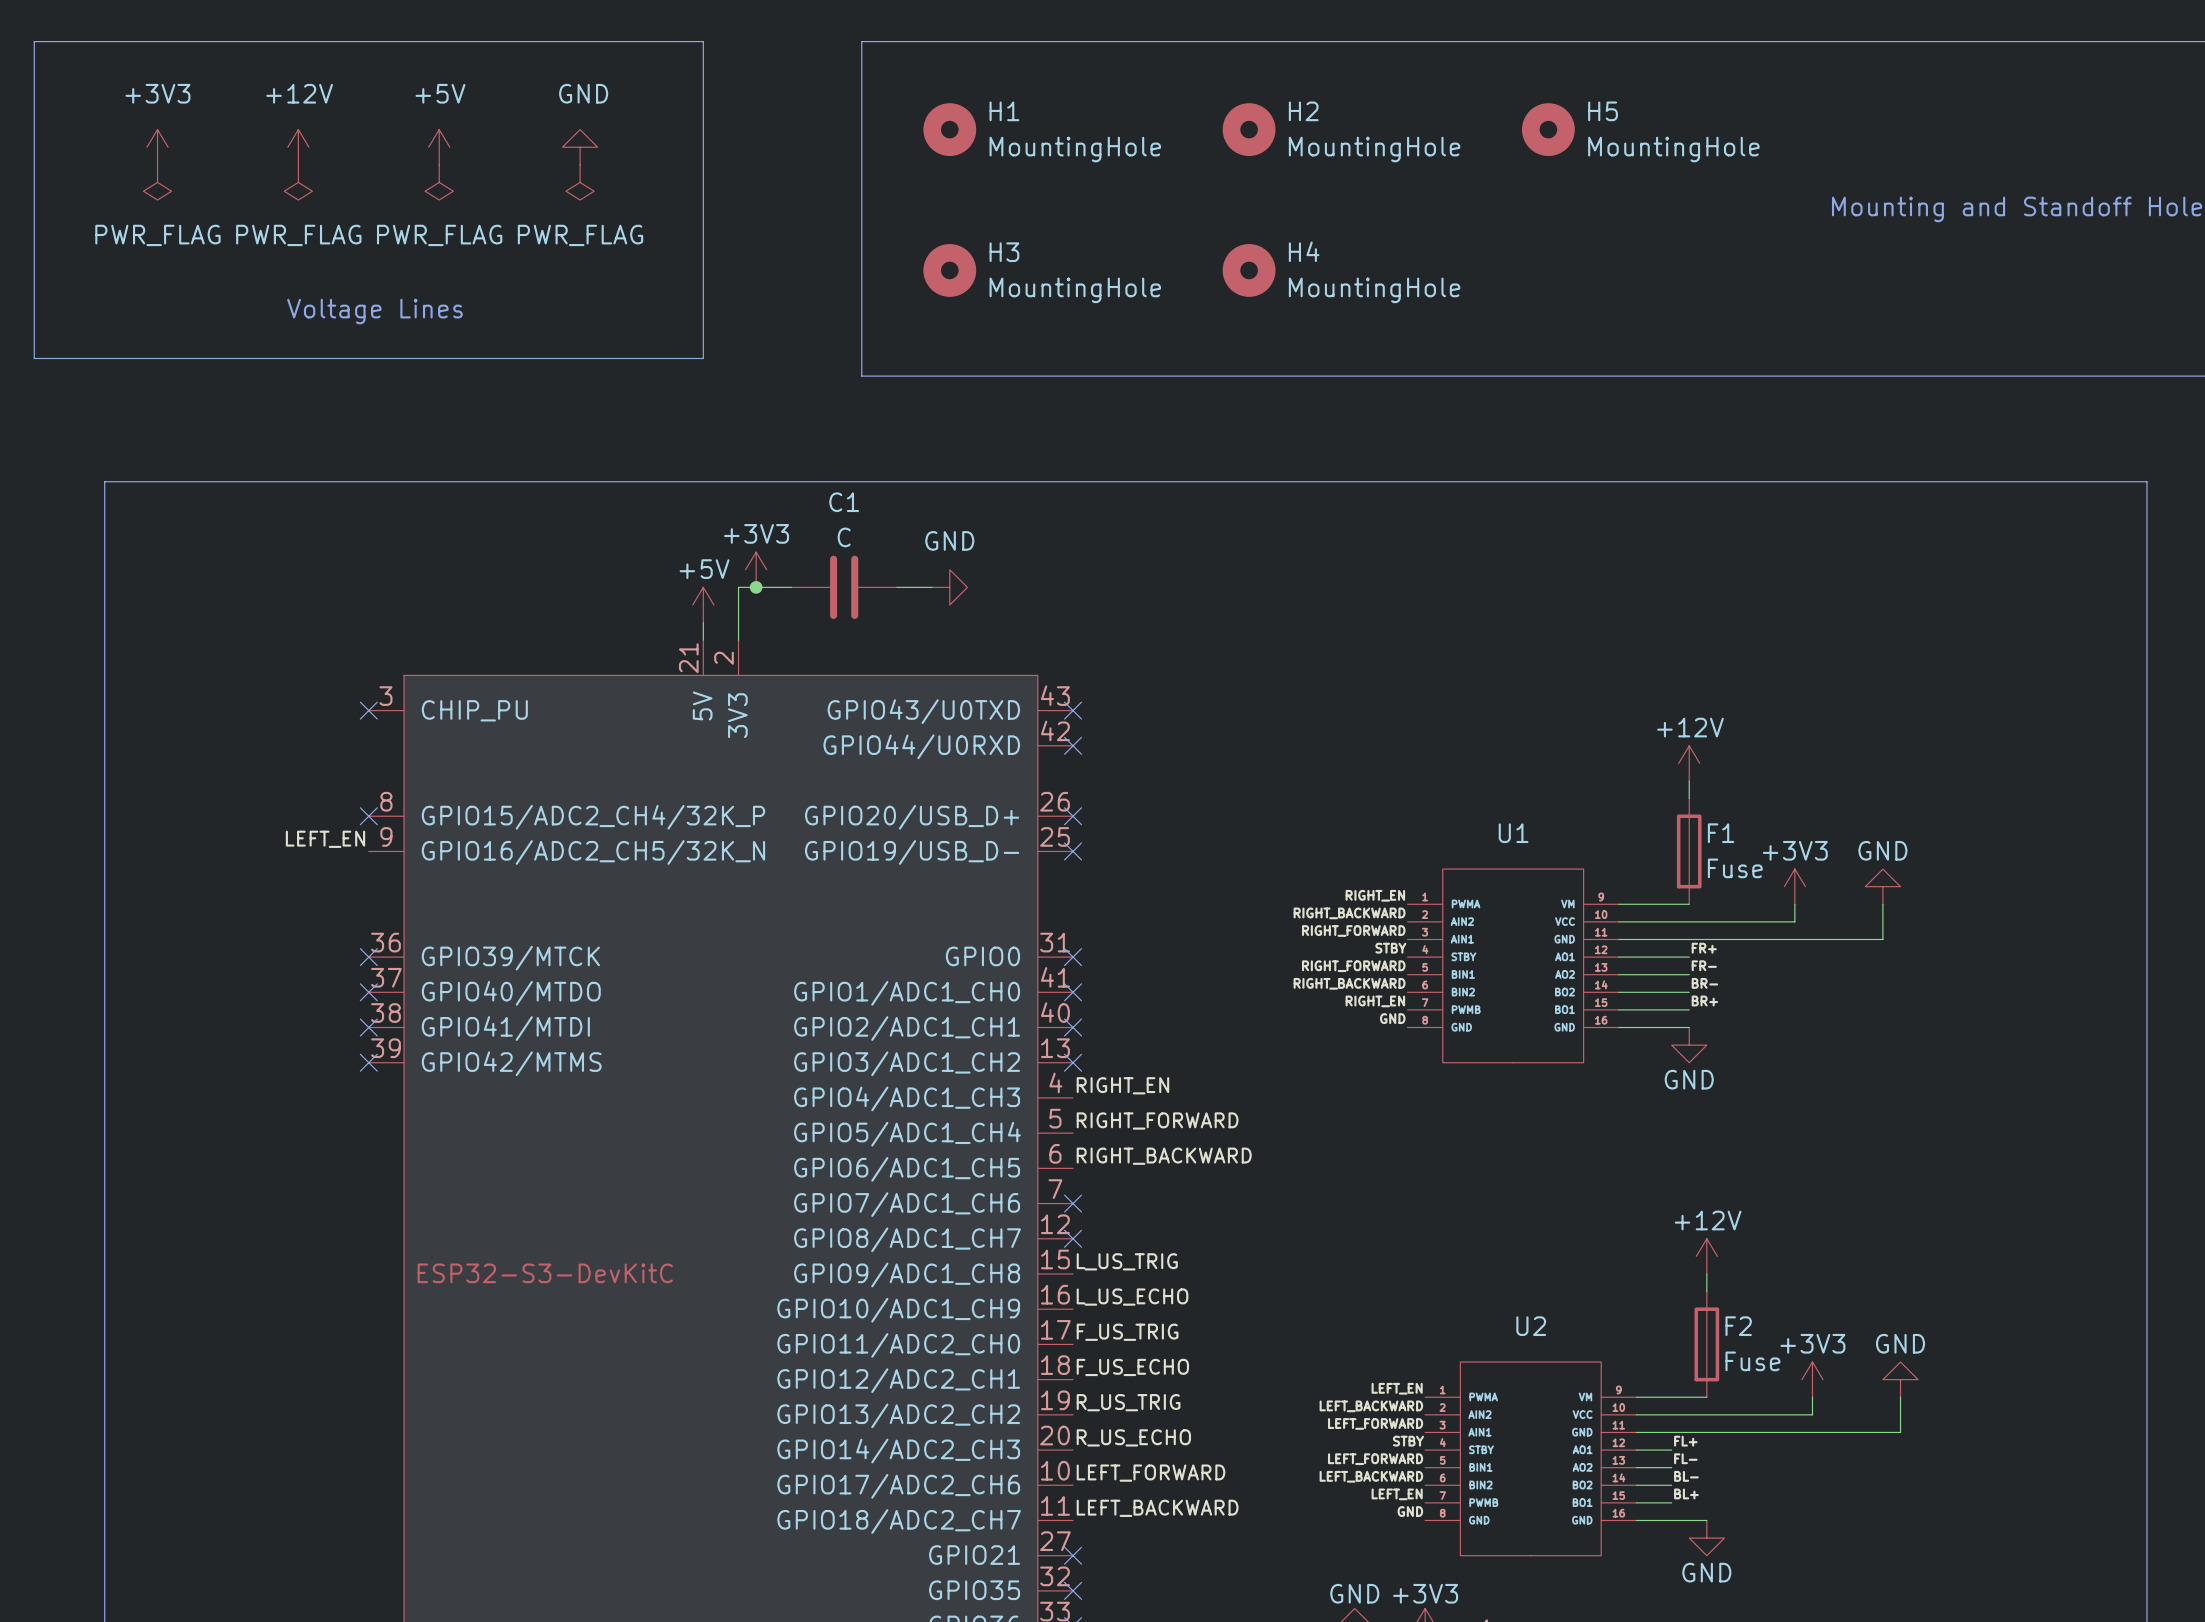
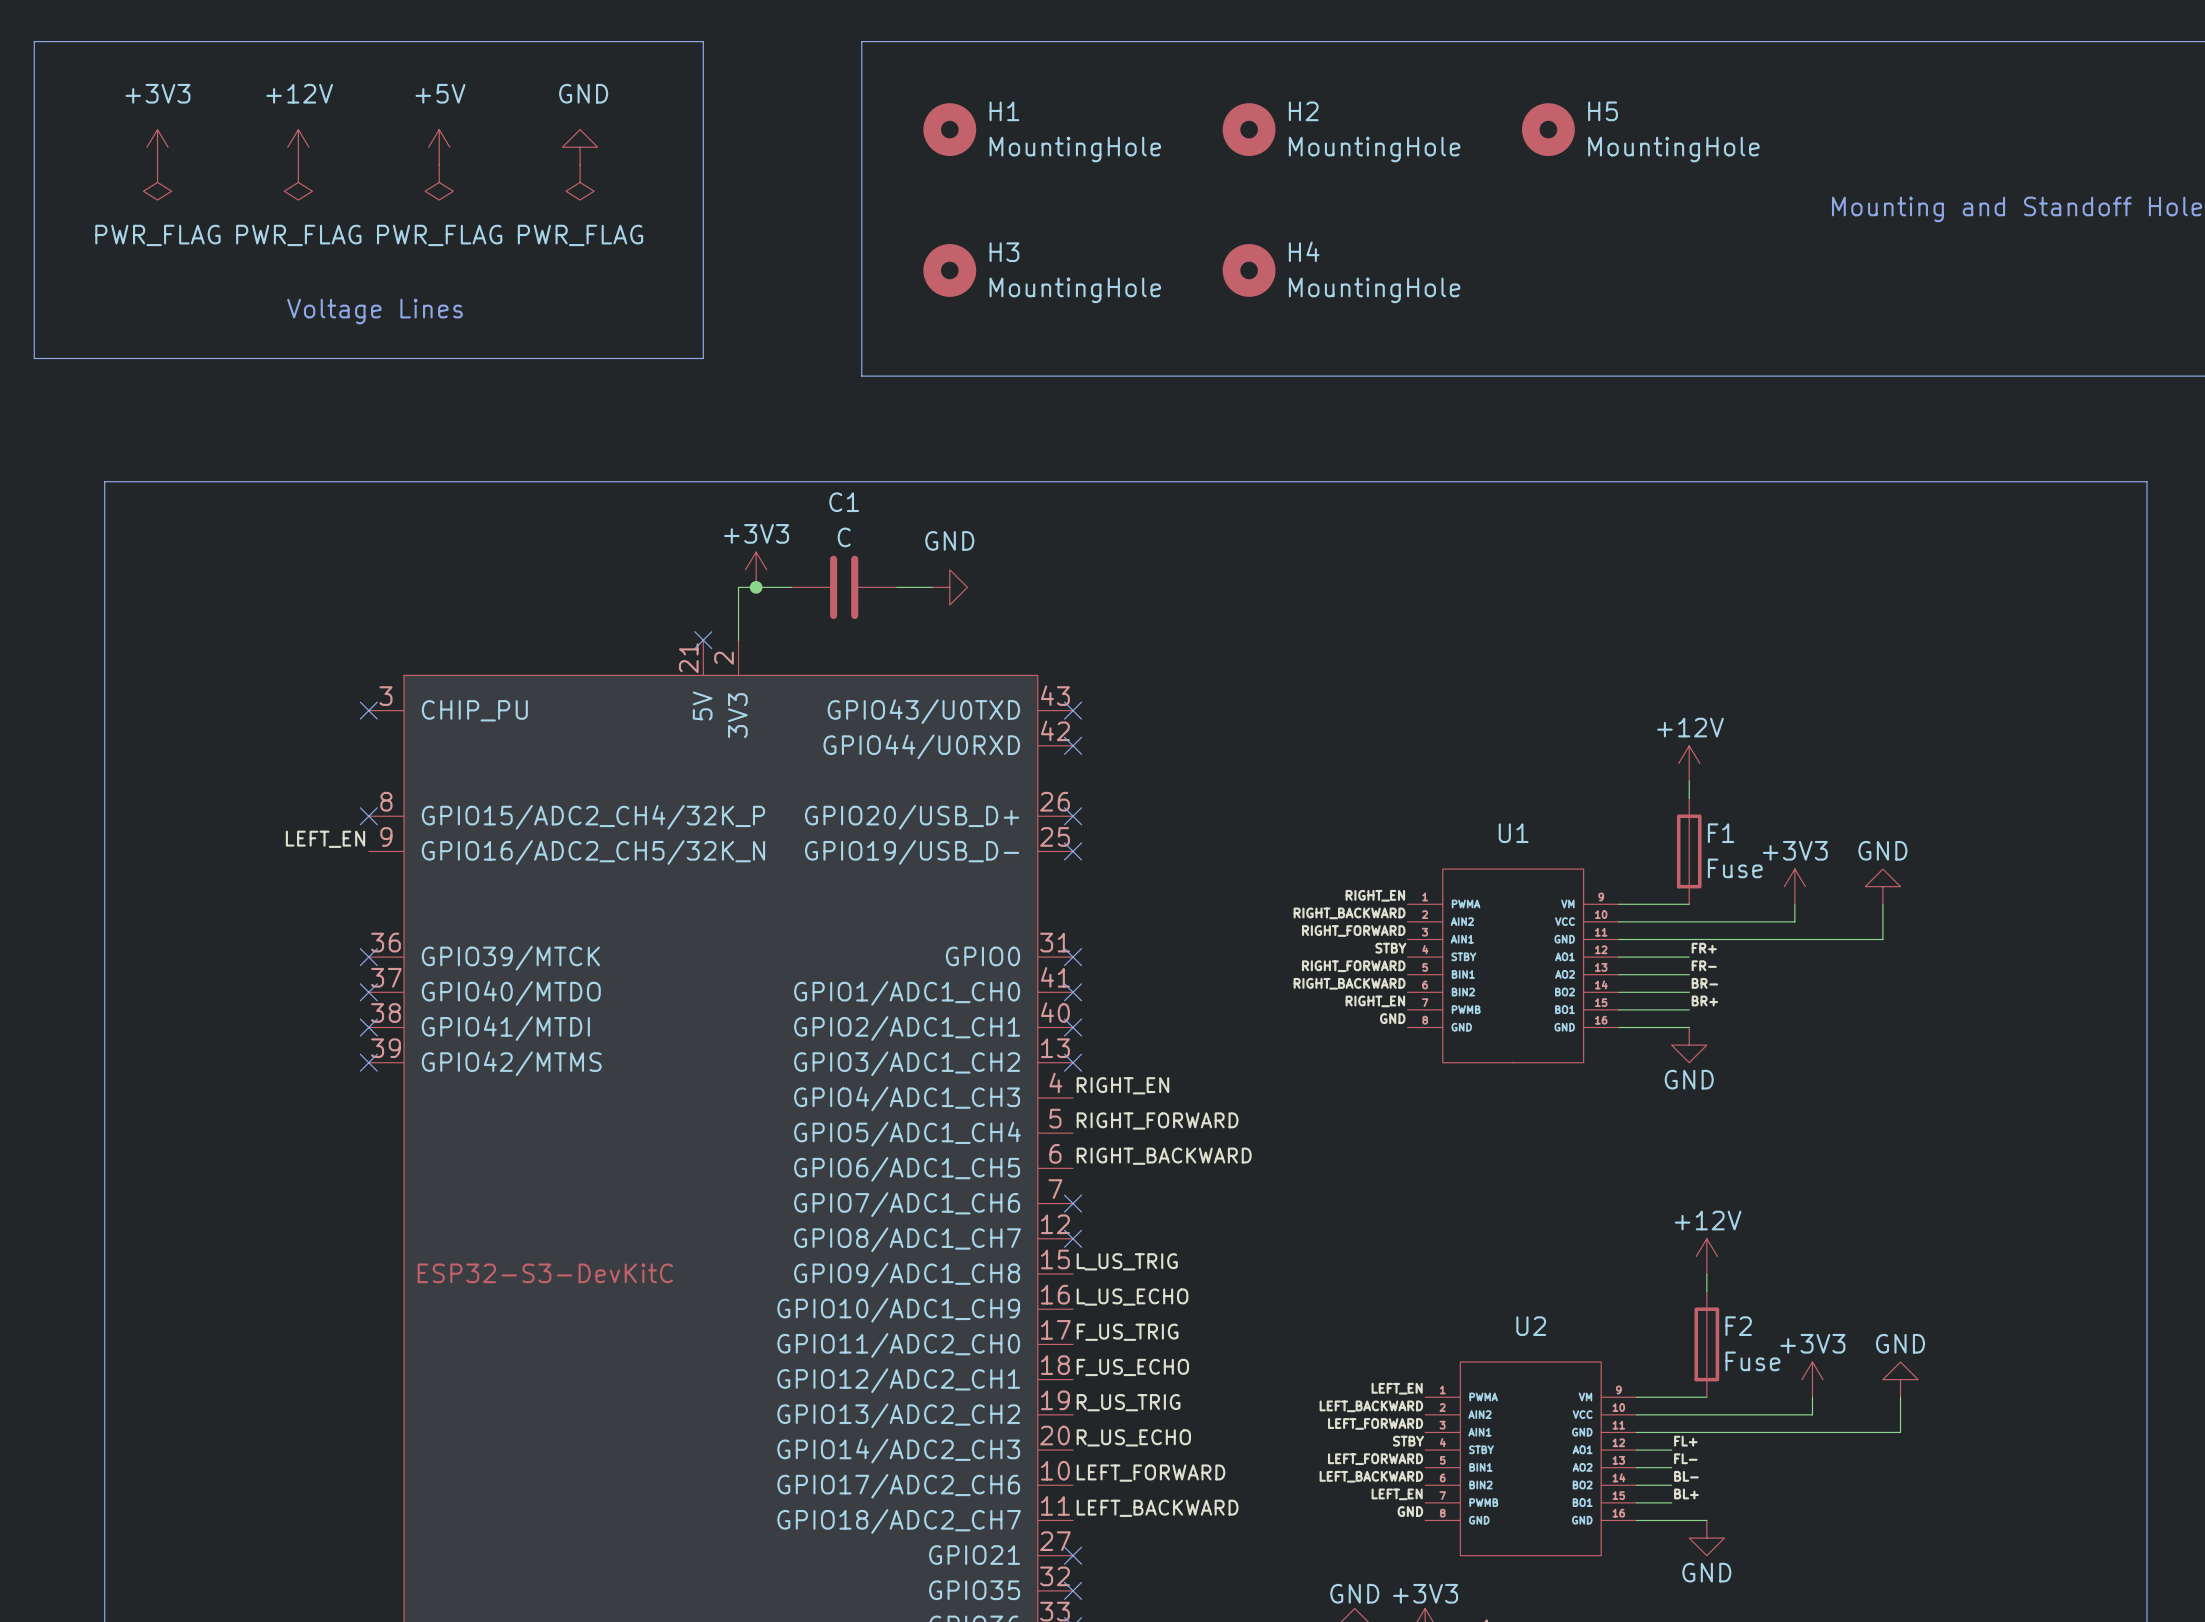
power symbol: +5V (703, 604) -> none
wire: (703, 622) (703, 640) -> none
no-connect mark: none -> (703, 640)

